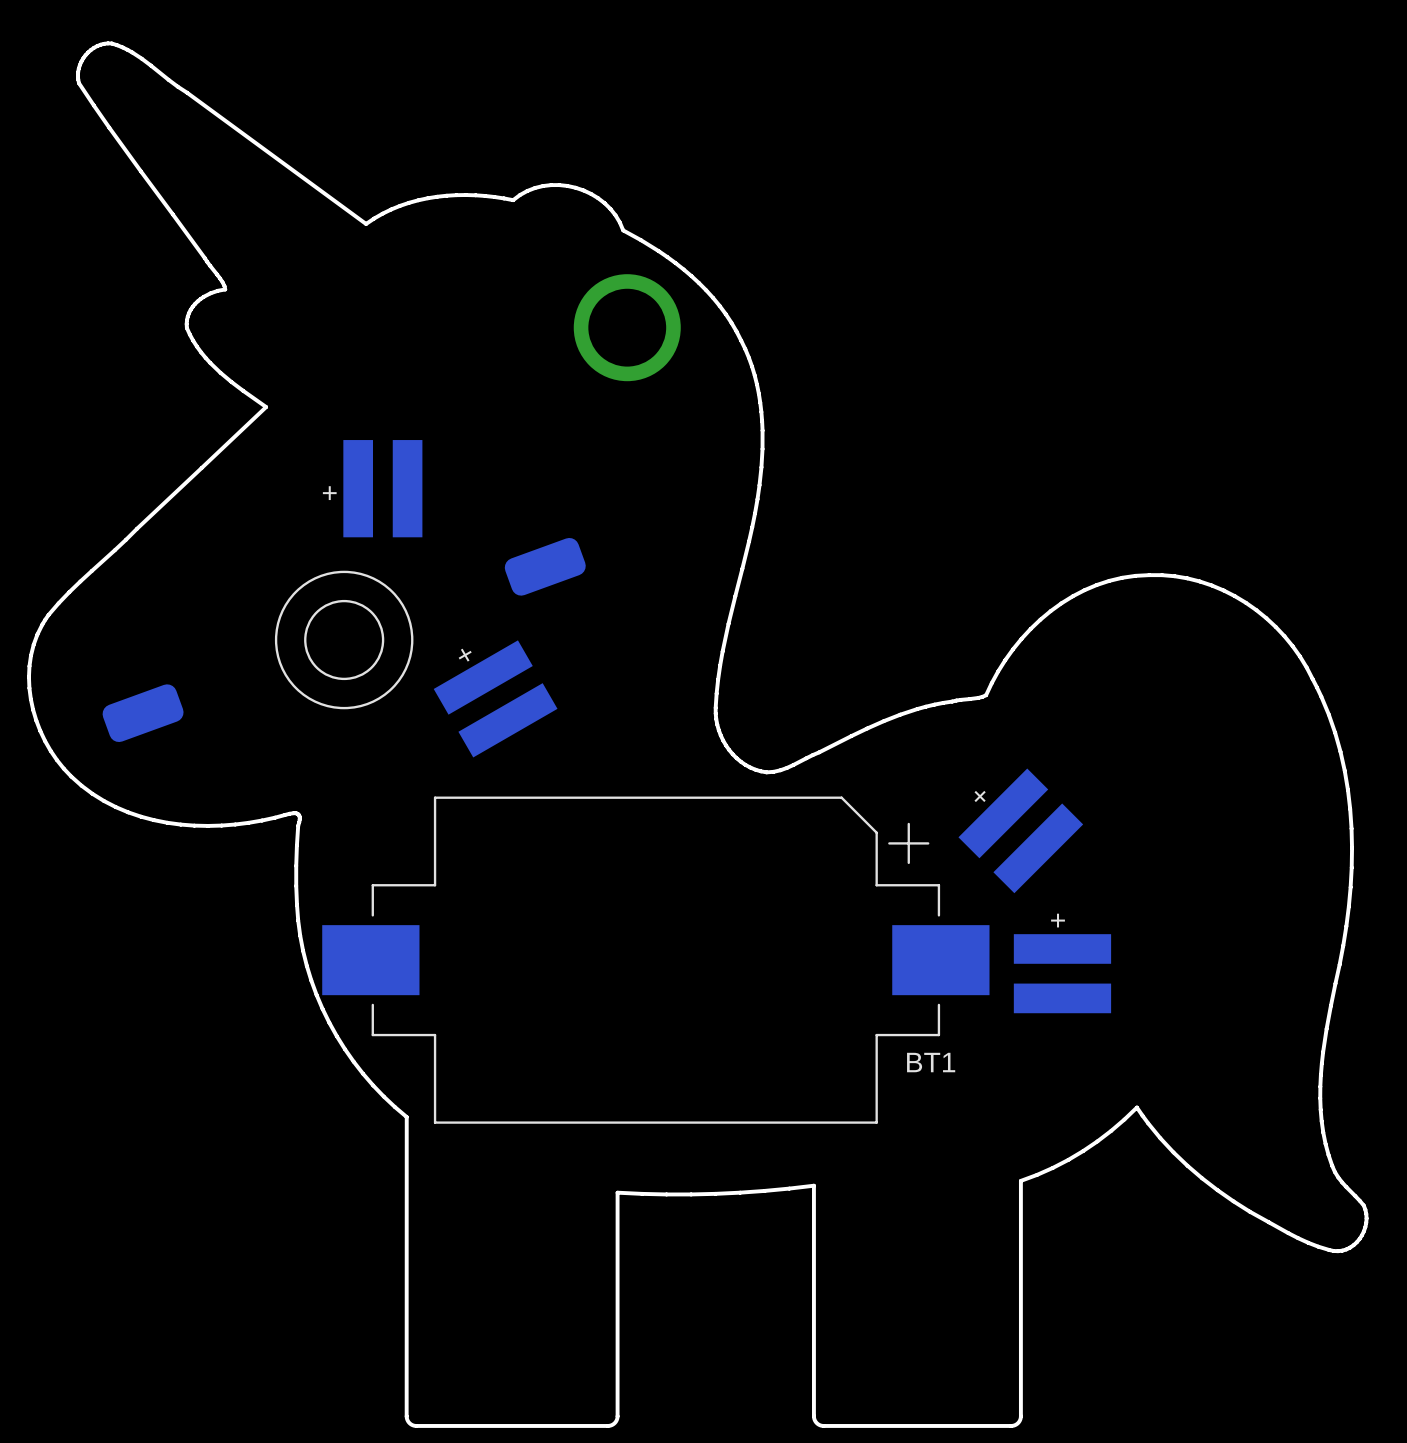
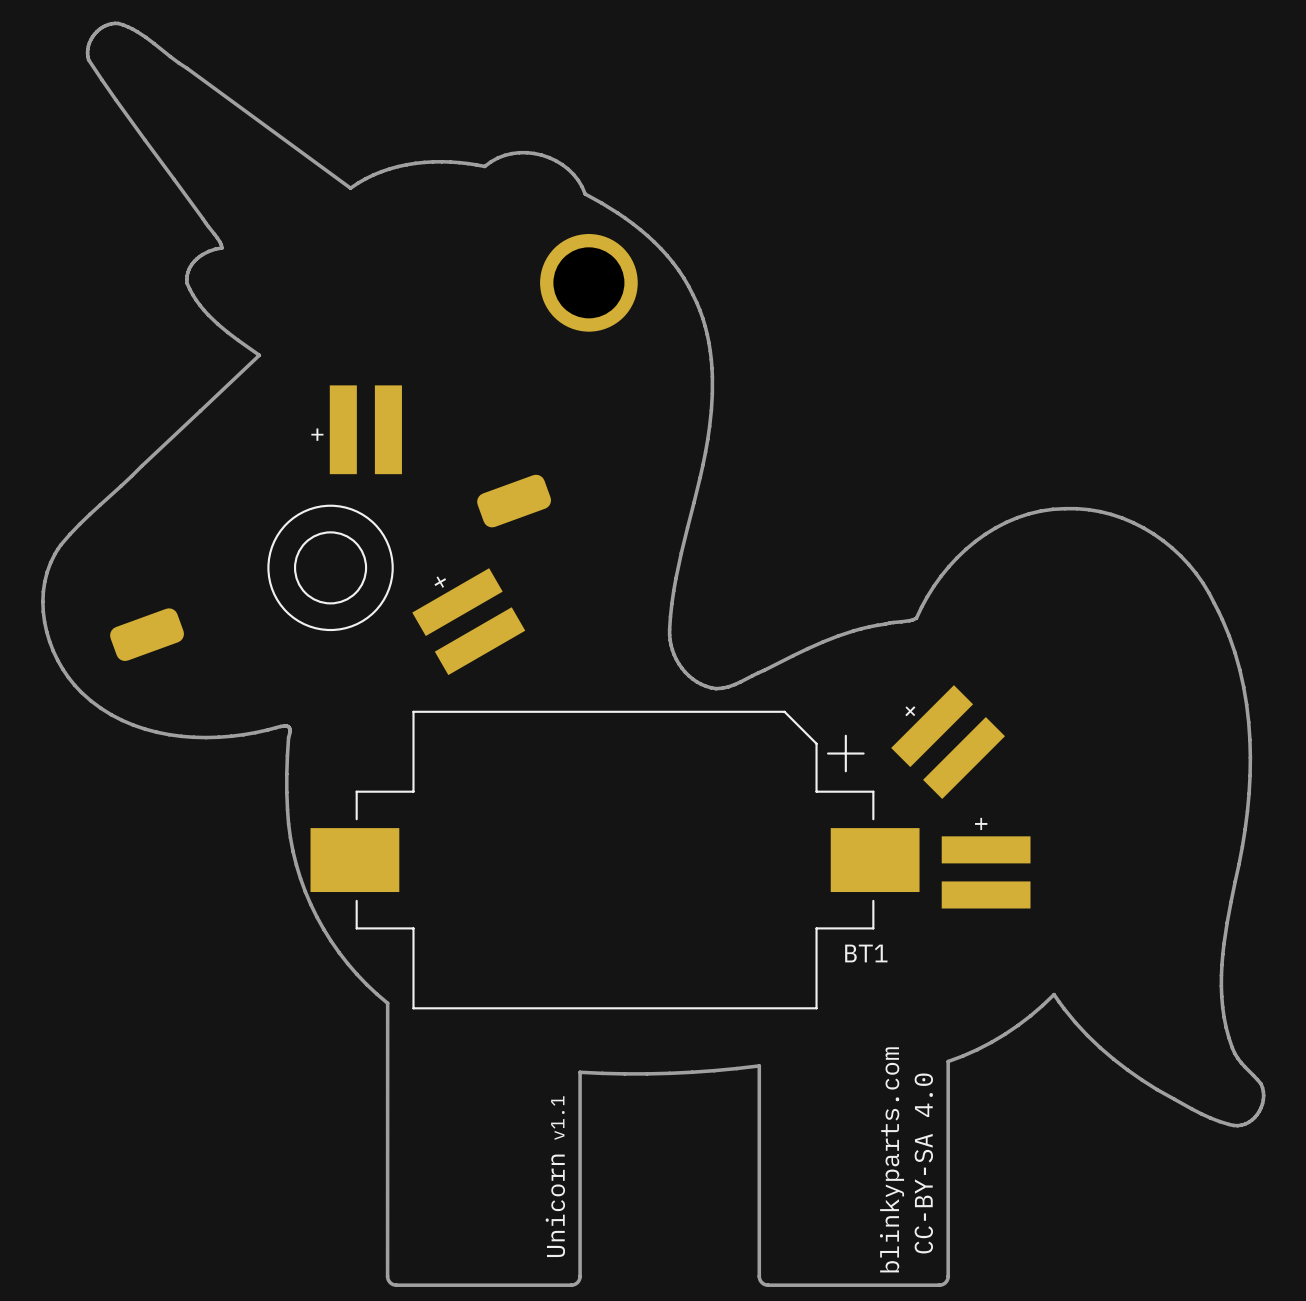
text: none -> v1.1 (557, 1118)
text: none -> blinkyparts.com (891, 1159)
text: none -> CC-BY-SA 4.0 (923, 1163)
text: none -> Unicorn (555, 1205)

